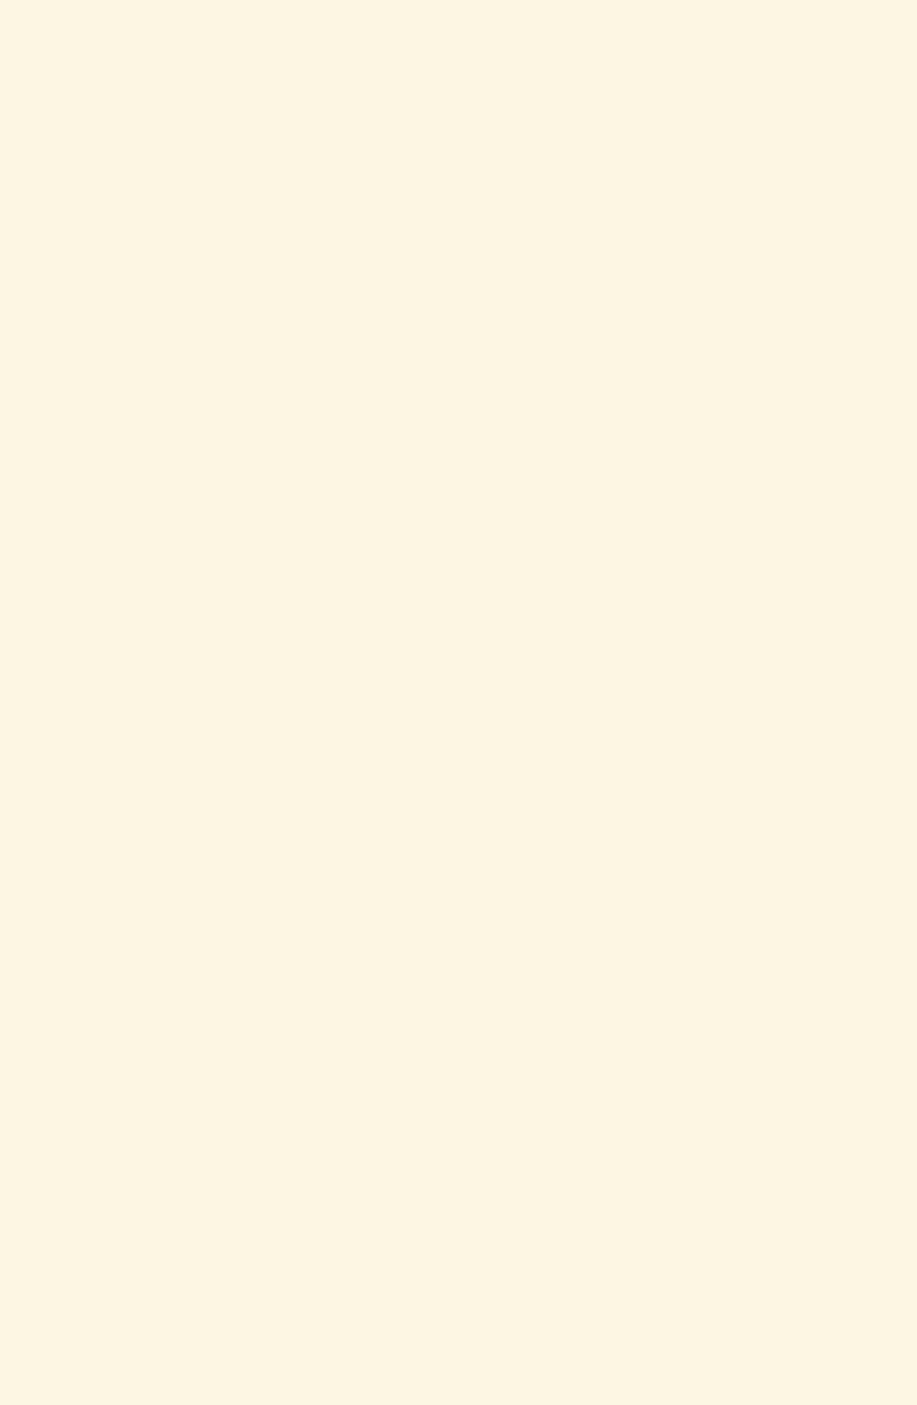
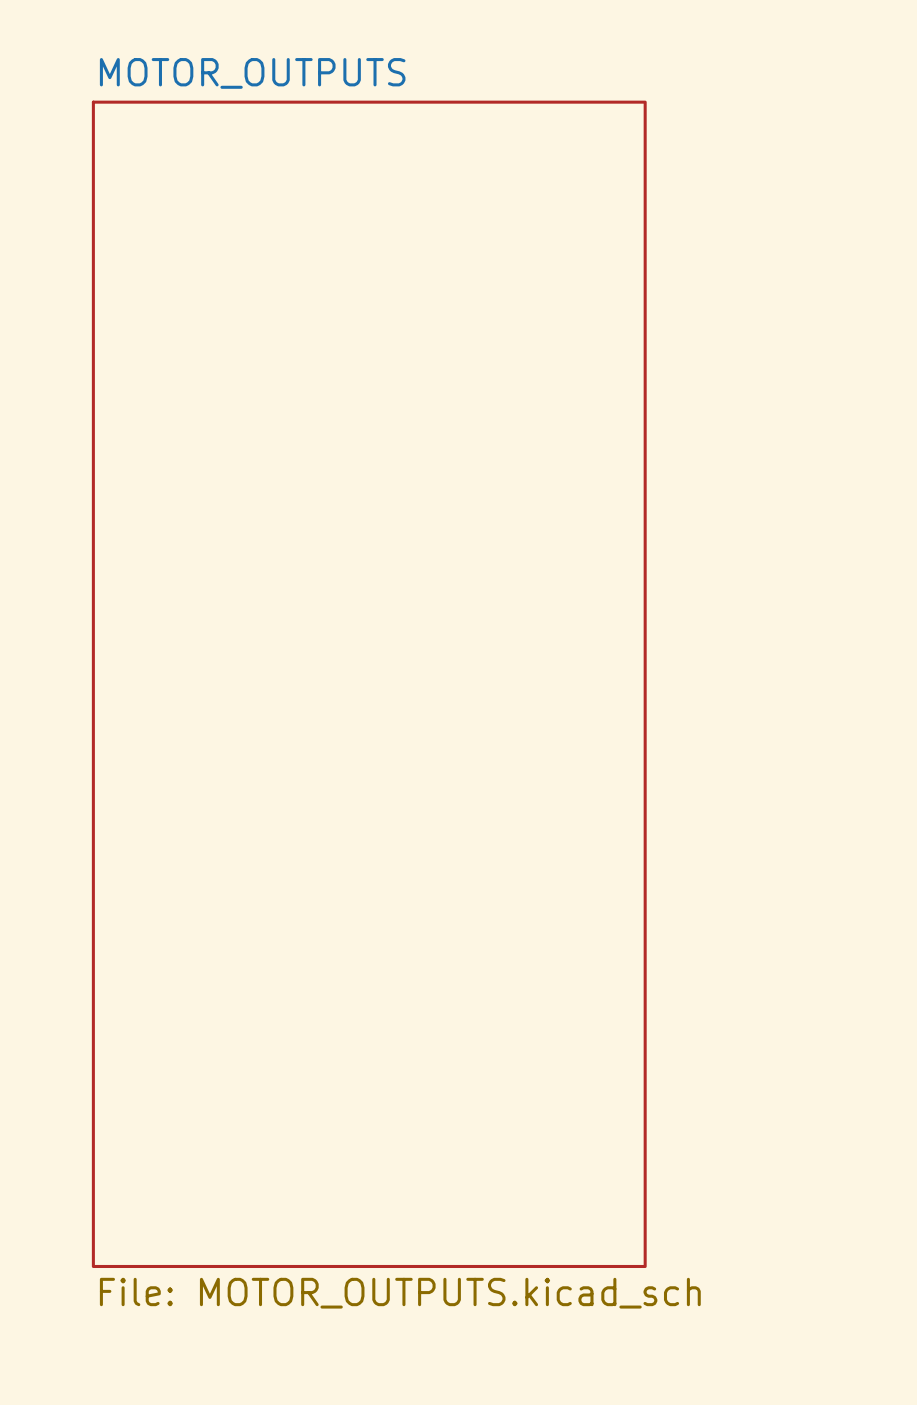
sheet MOTOR_OUTPUTS: none -> File: MOTOR_OUTPUTS.kicad_sch (369, 684)

